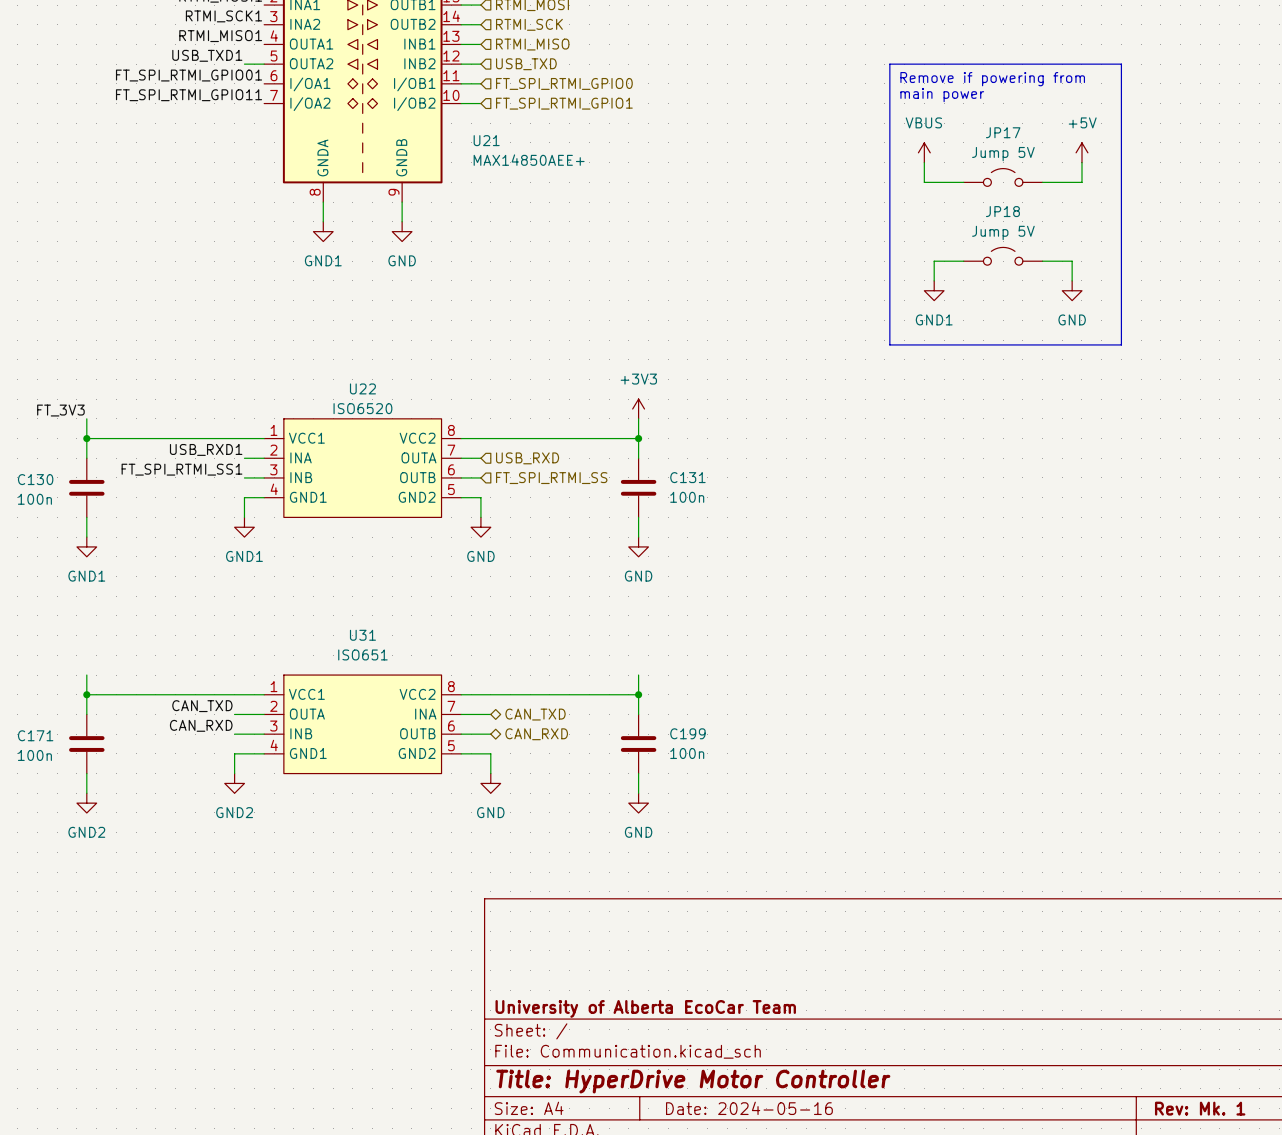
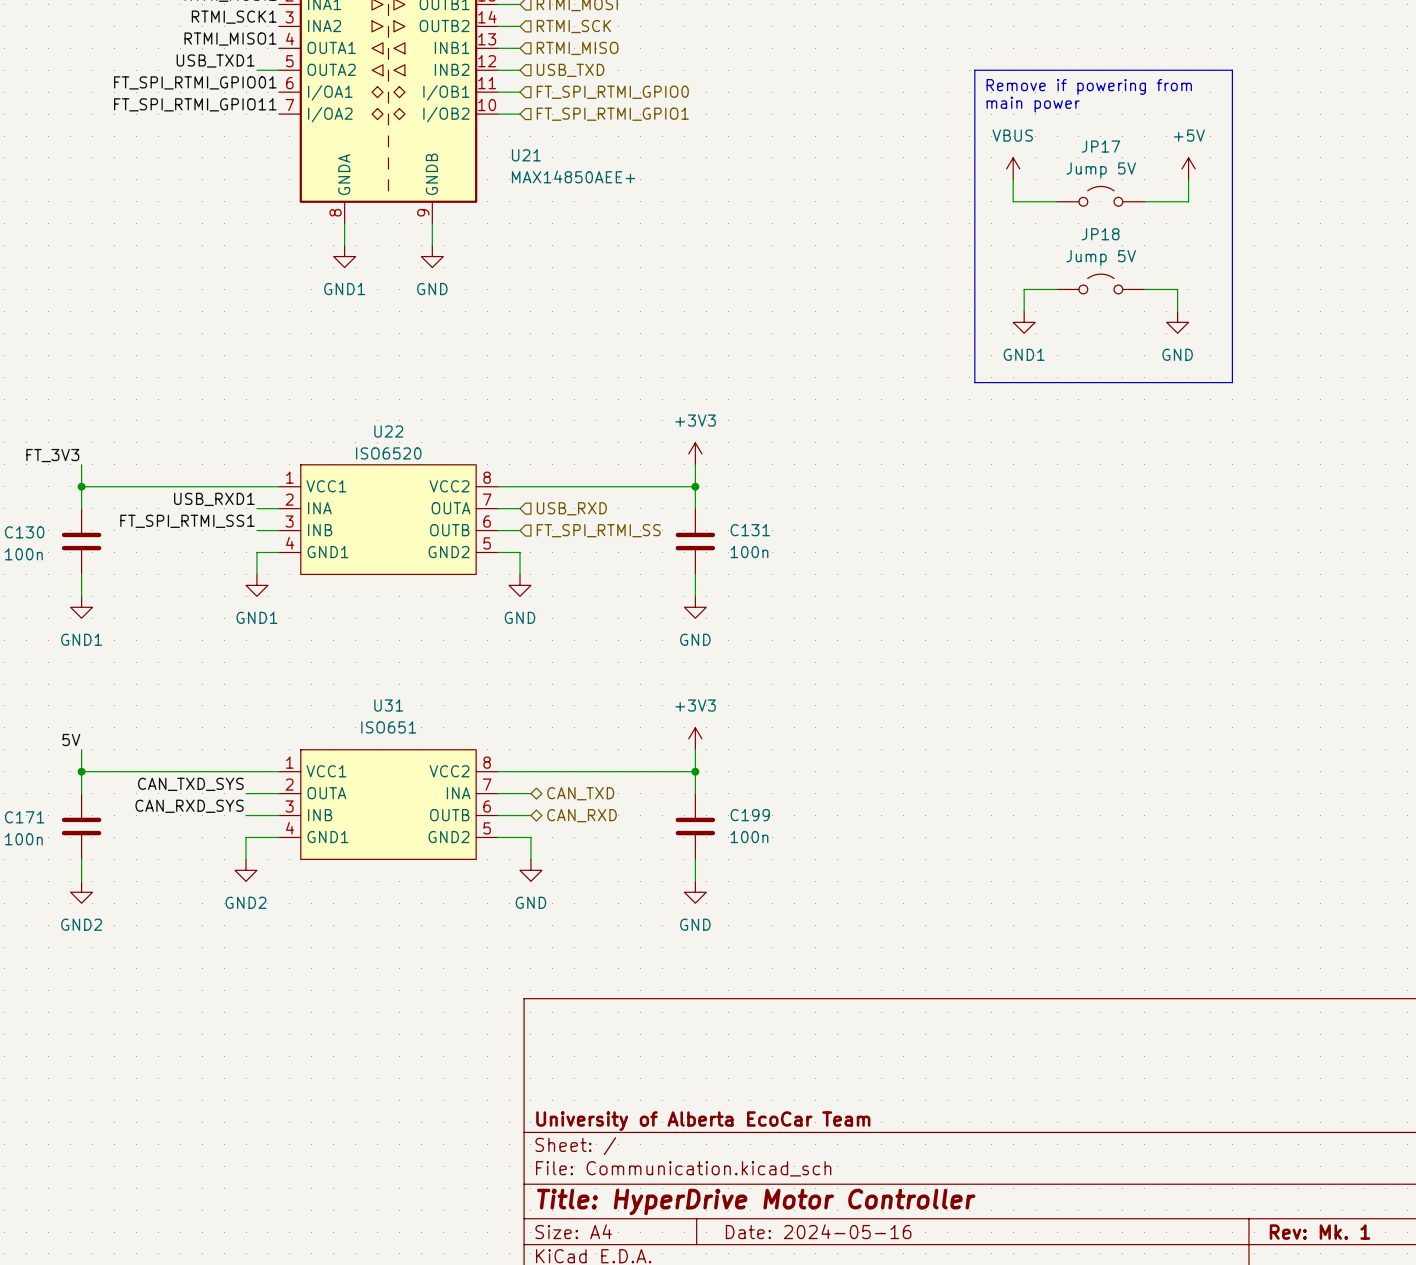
power symbol: none -> +3V3 (695, 738)
label: none -> 5V (71, 739)
label: CAN_TXD (202, 706) -> CAN_TXD_SYS (190, 784)
label: CAN_RXD (201, 725) -> CAN_RXD_SYS (189, 806)

